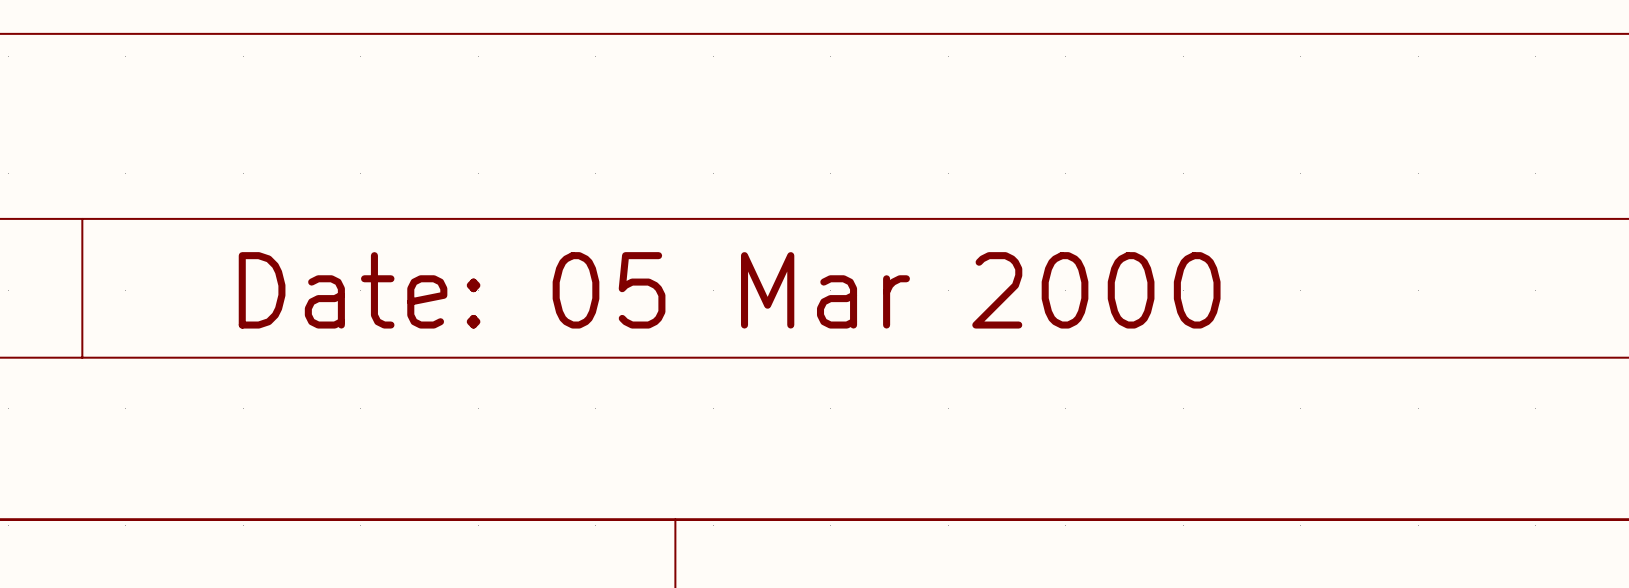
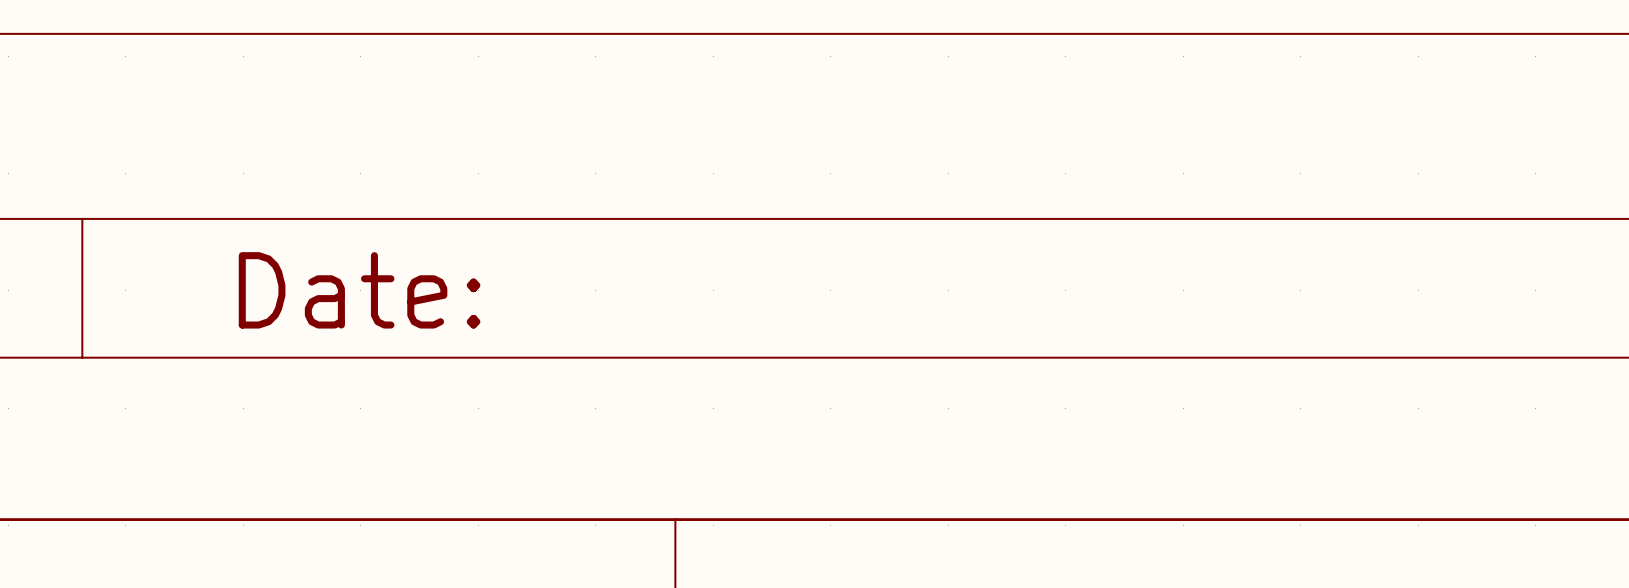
title block: Date: 05 Mar 2000 (729, 290) -> Date: (359, 290)

